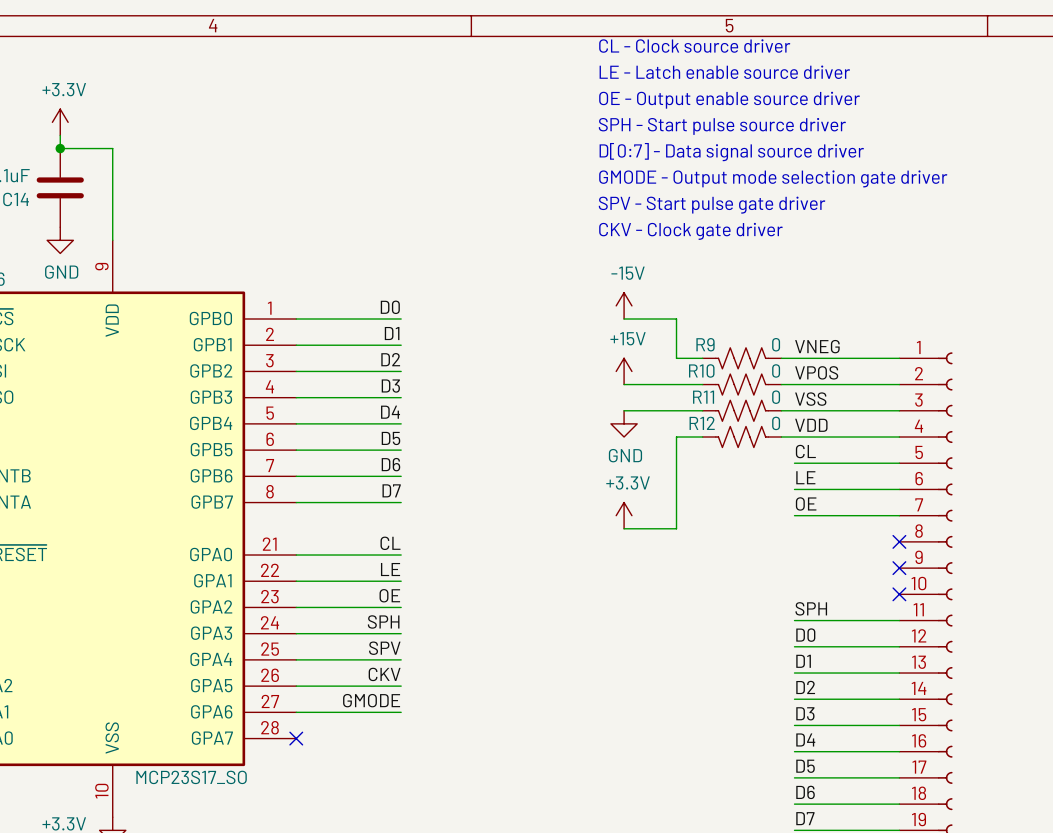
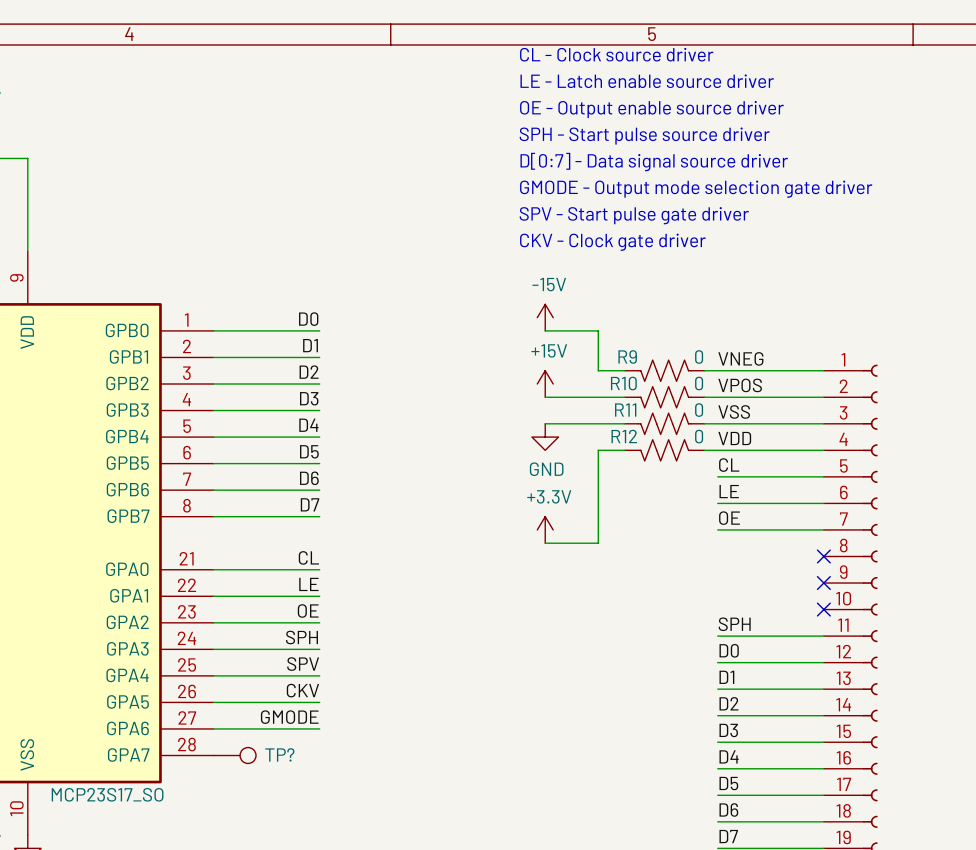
no-connect mark: (296, 738) -> none
TP?: none -> (234, 755)

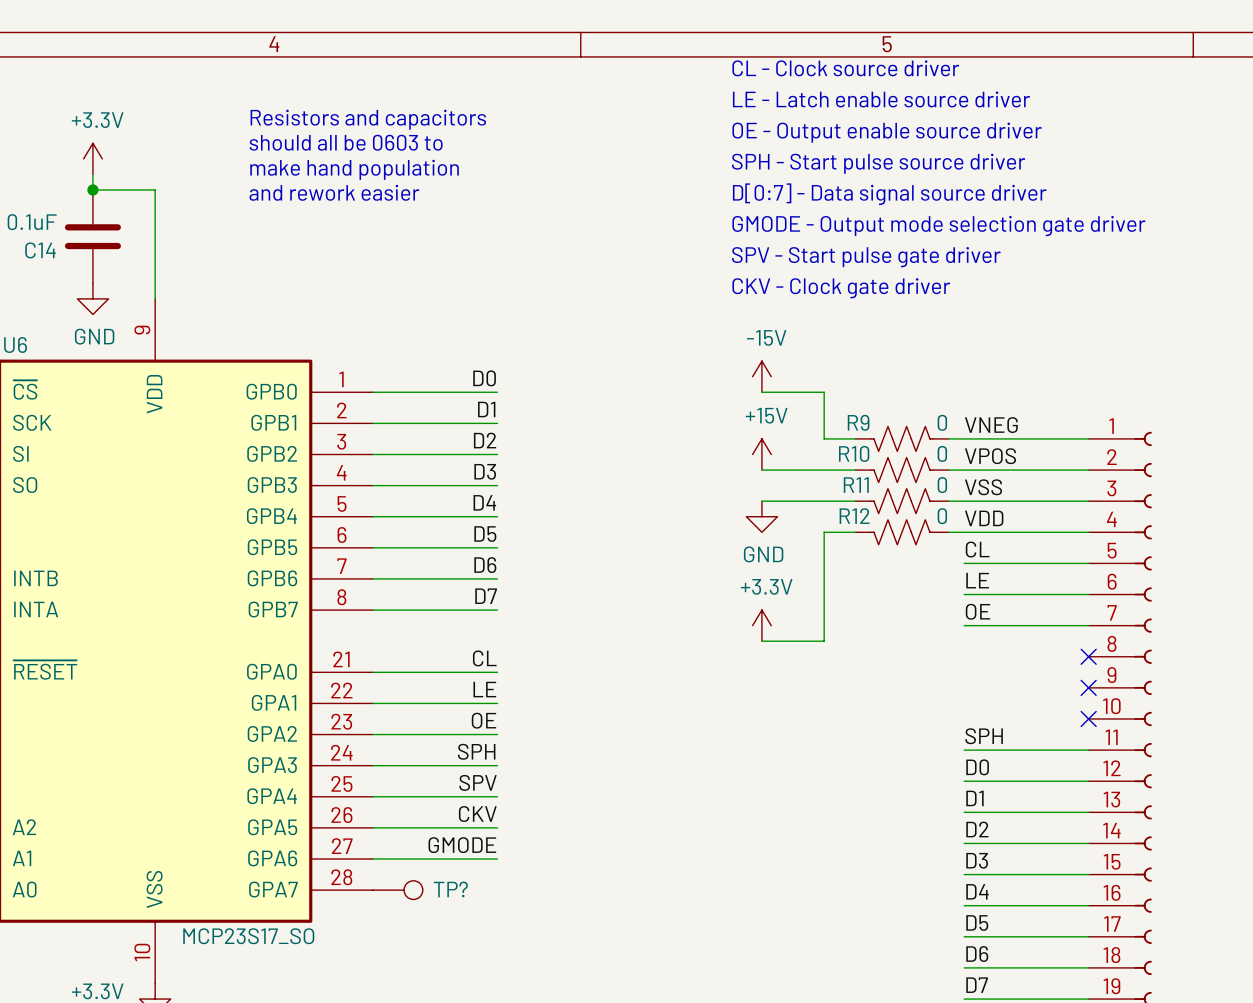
text: none -> Resistors and capacitors (368, 119)
text: none -> should all be 0603 to (346, 142)
text: none -> make hand population (354, 169)
text: none -> and rework easier (334, 192)

